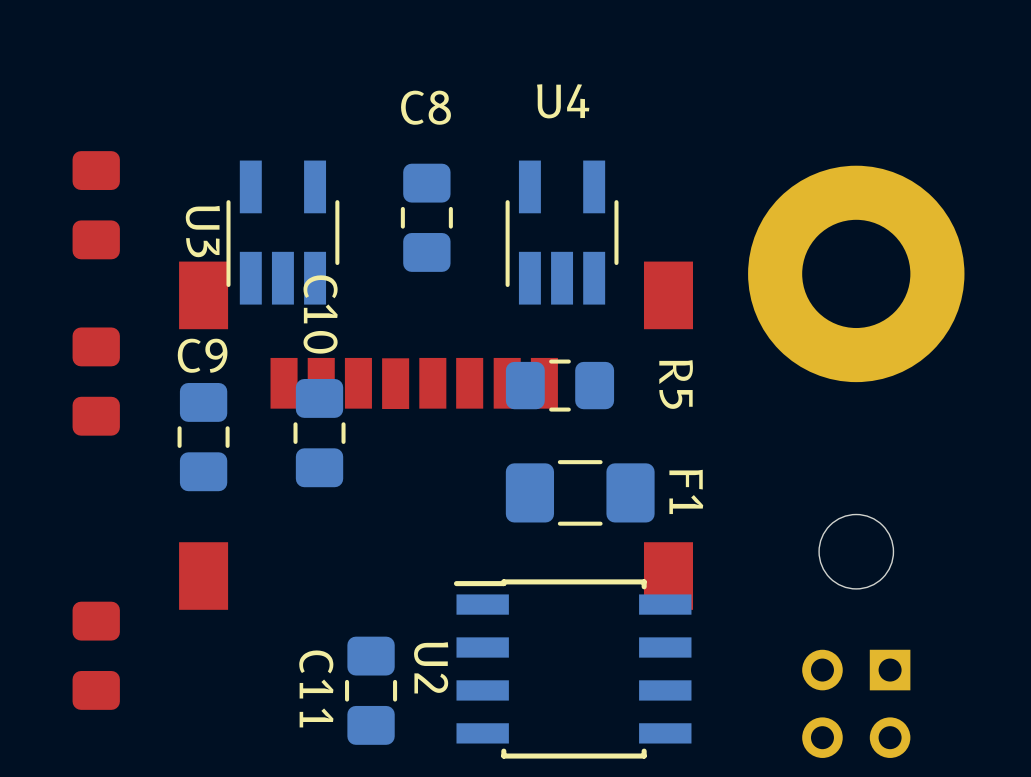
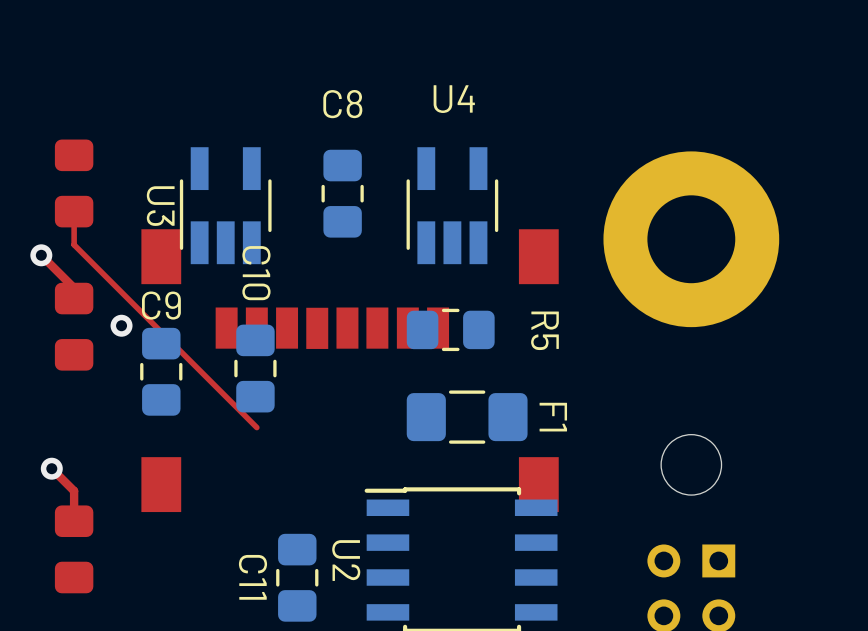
top track: none -> (74, 211) (74, 244) (256, 427)
top track: none -> (41, 255) (74, 288) (74, 298)
via: none -> (41, 255)
via: none -> (121, 325)
top track: none -> (51, 468) (74, 491) (74, 521)
via: none -> (51, 468)

